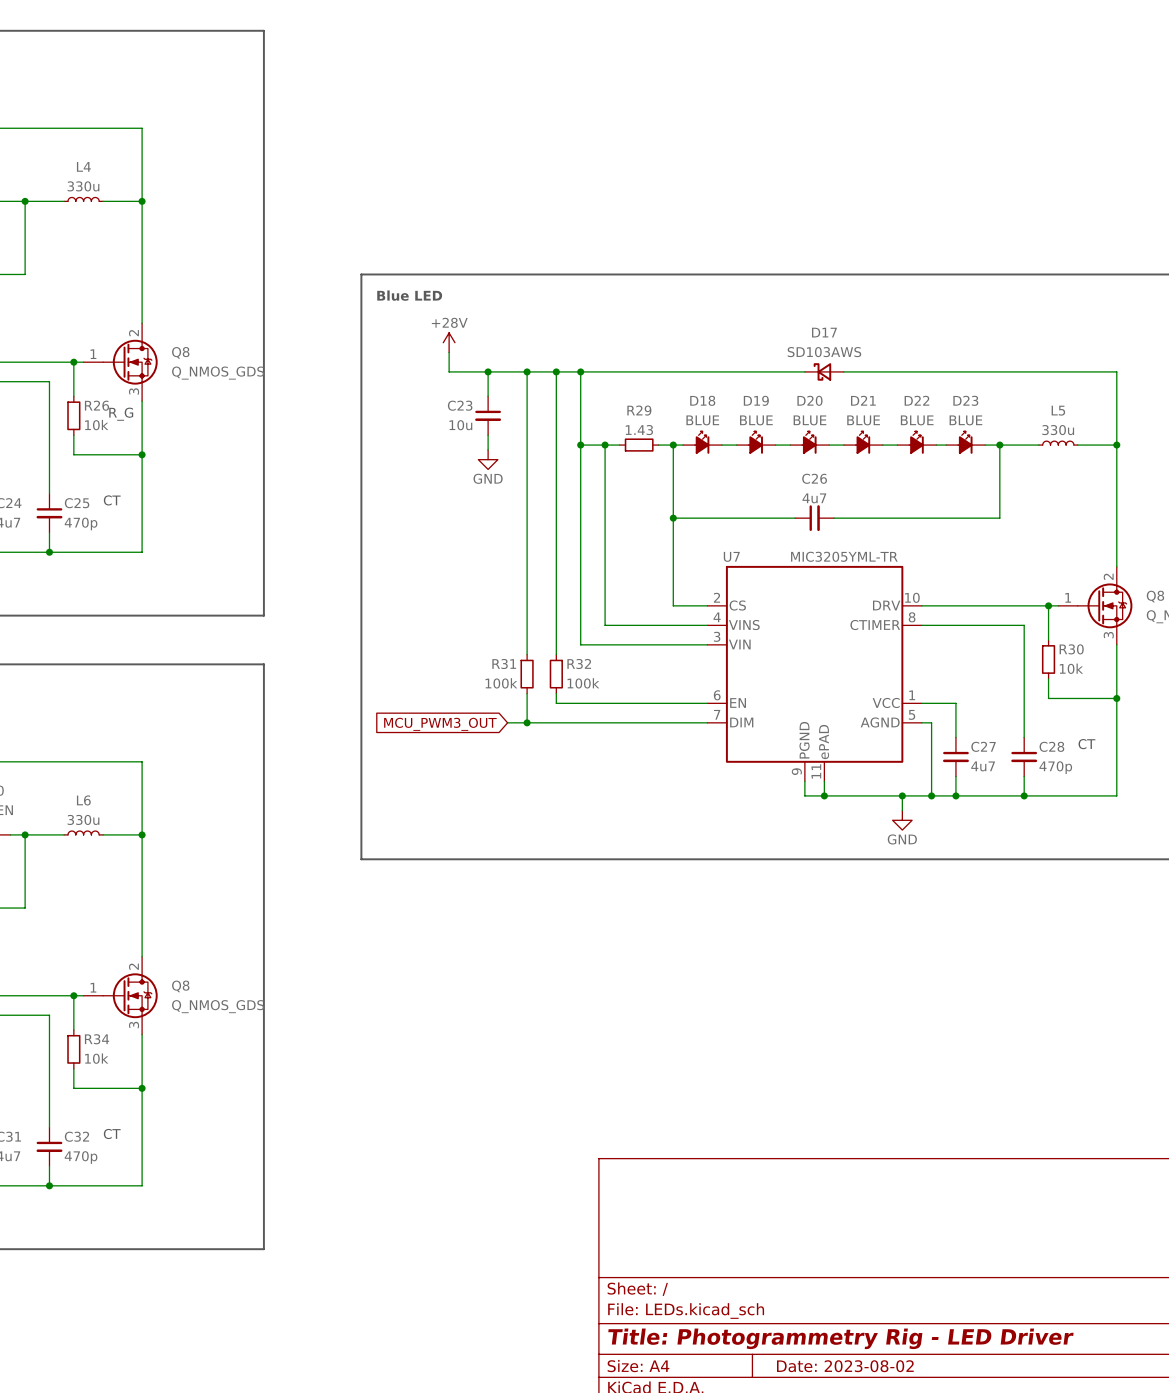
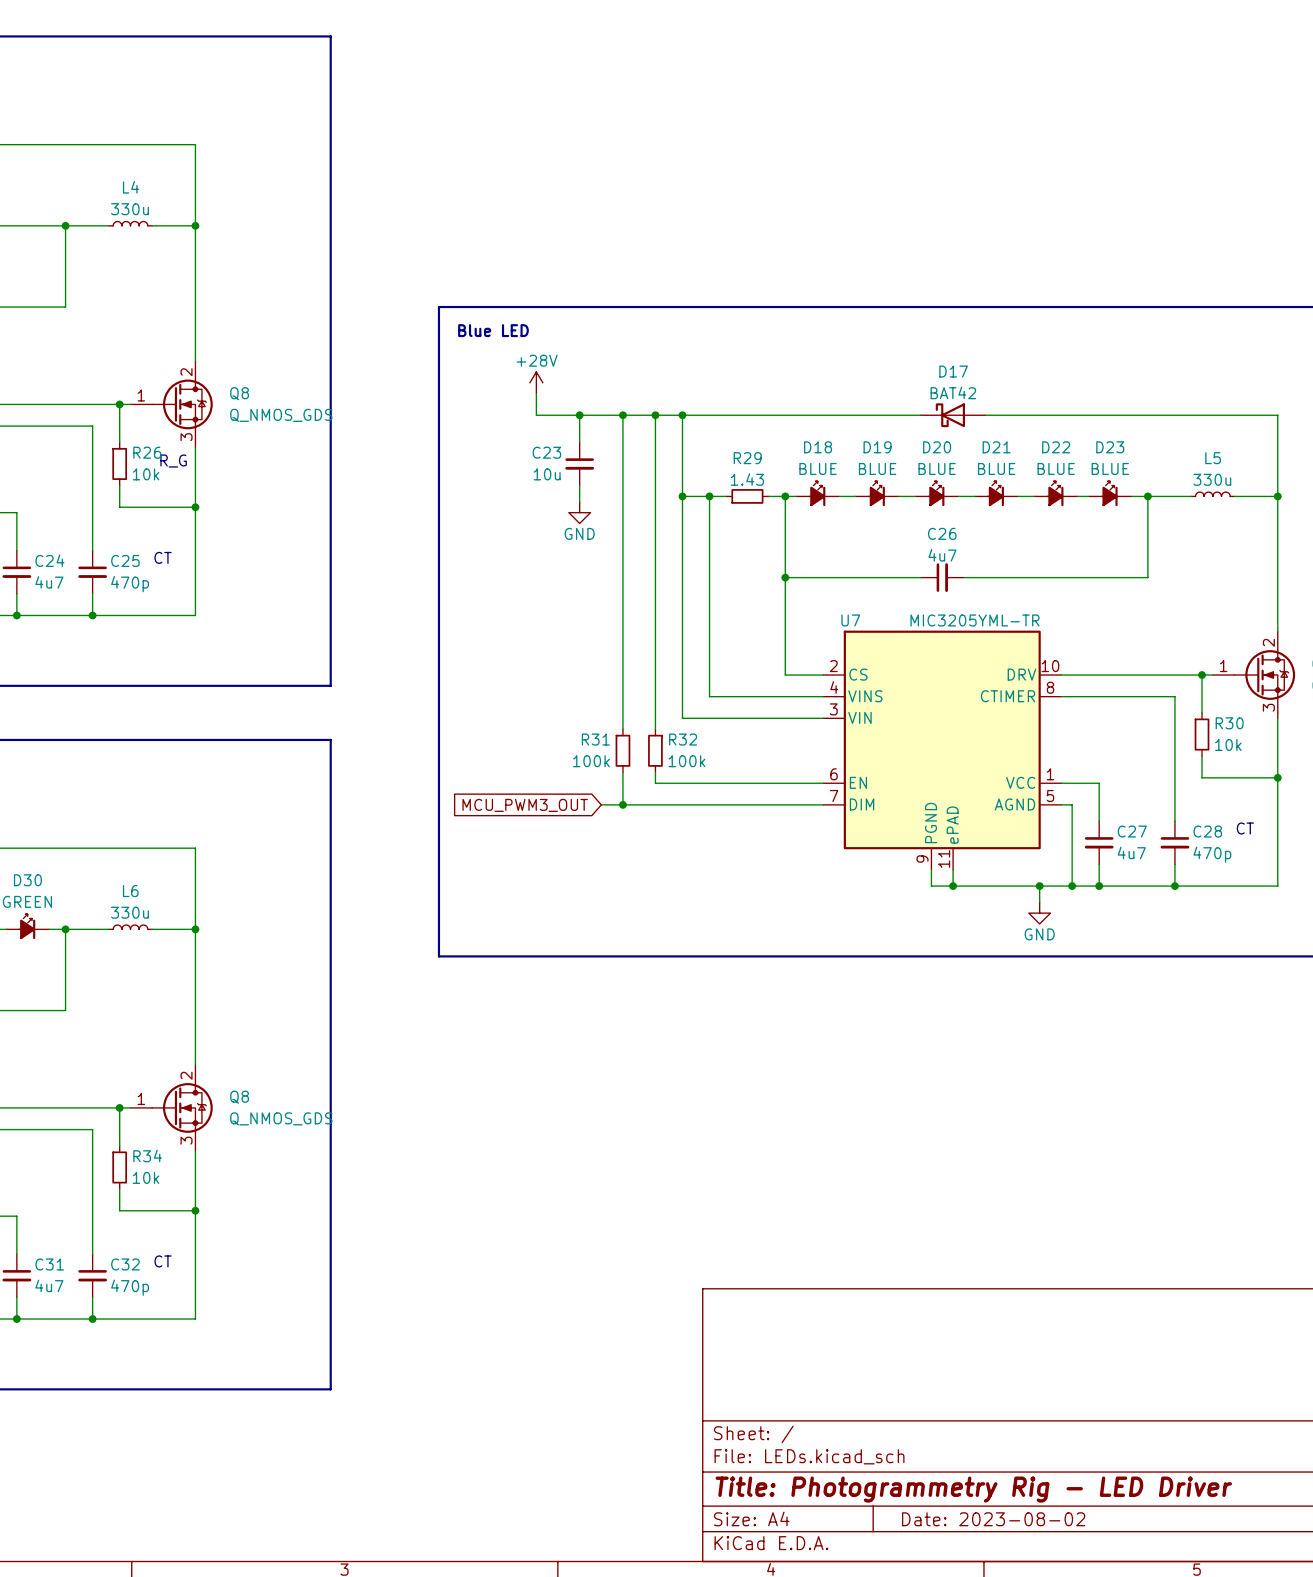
D17 value: SD103AWS (824, 352) -> BAT42 (953, 392)
D17 symbol: [804, 363, 844, 381] -> [920, 403, 986, 428]

